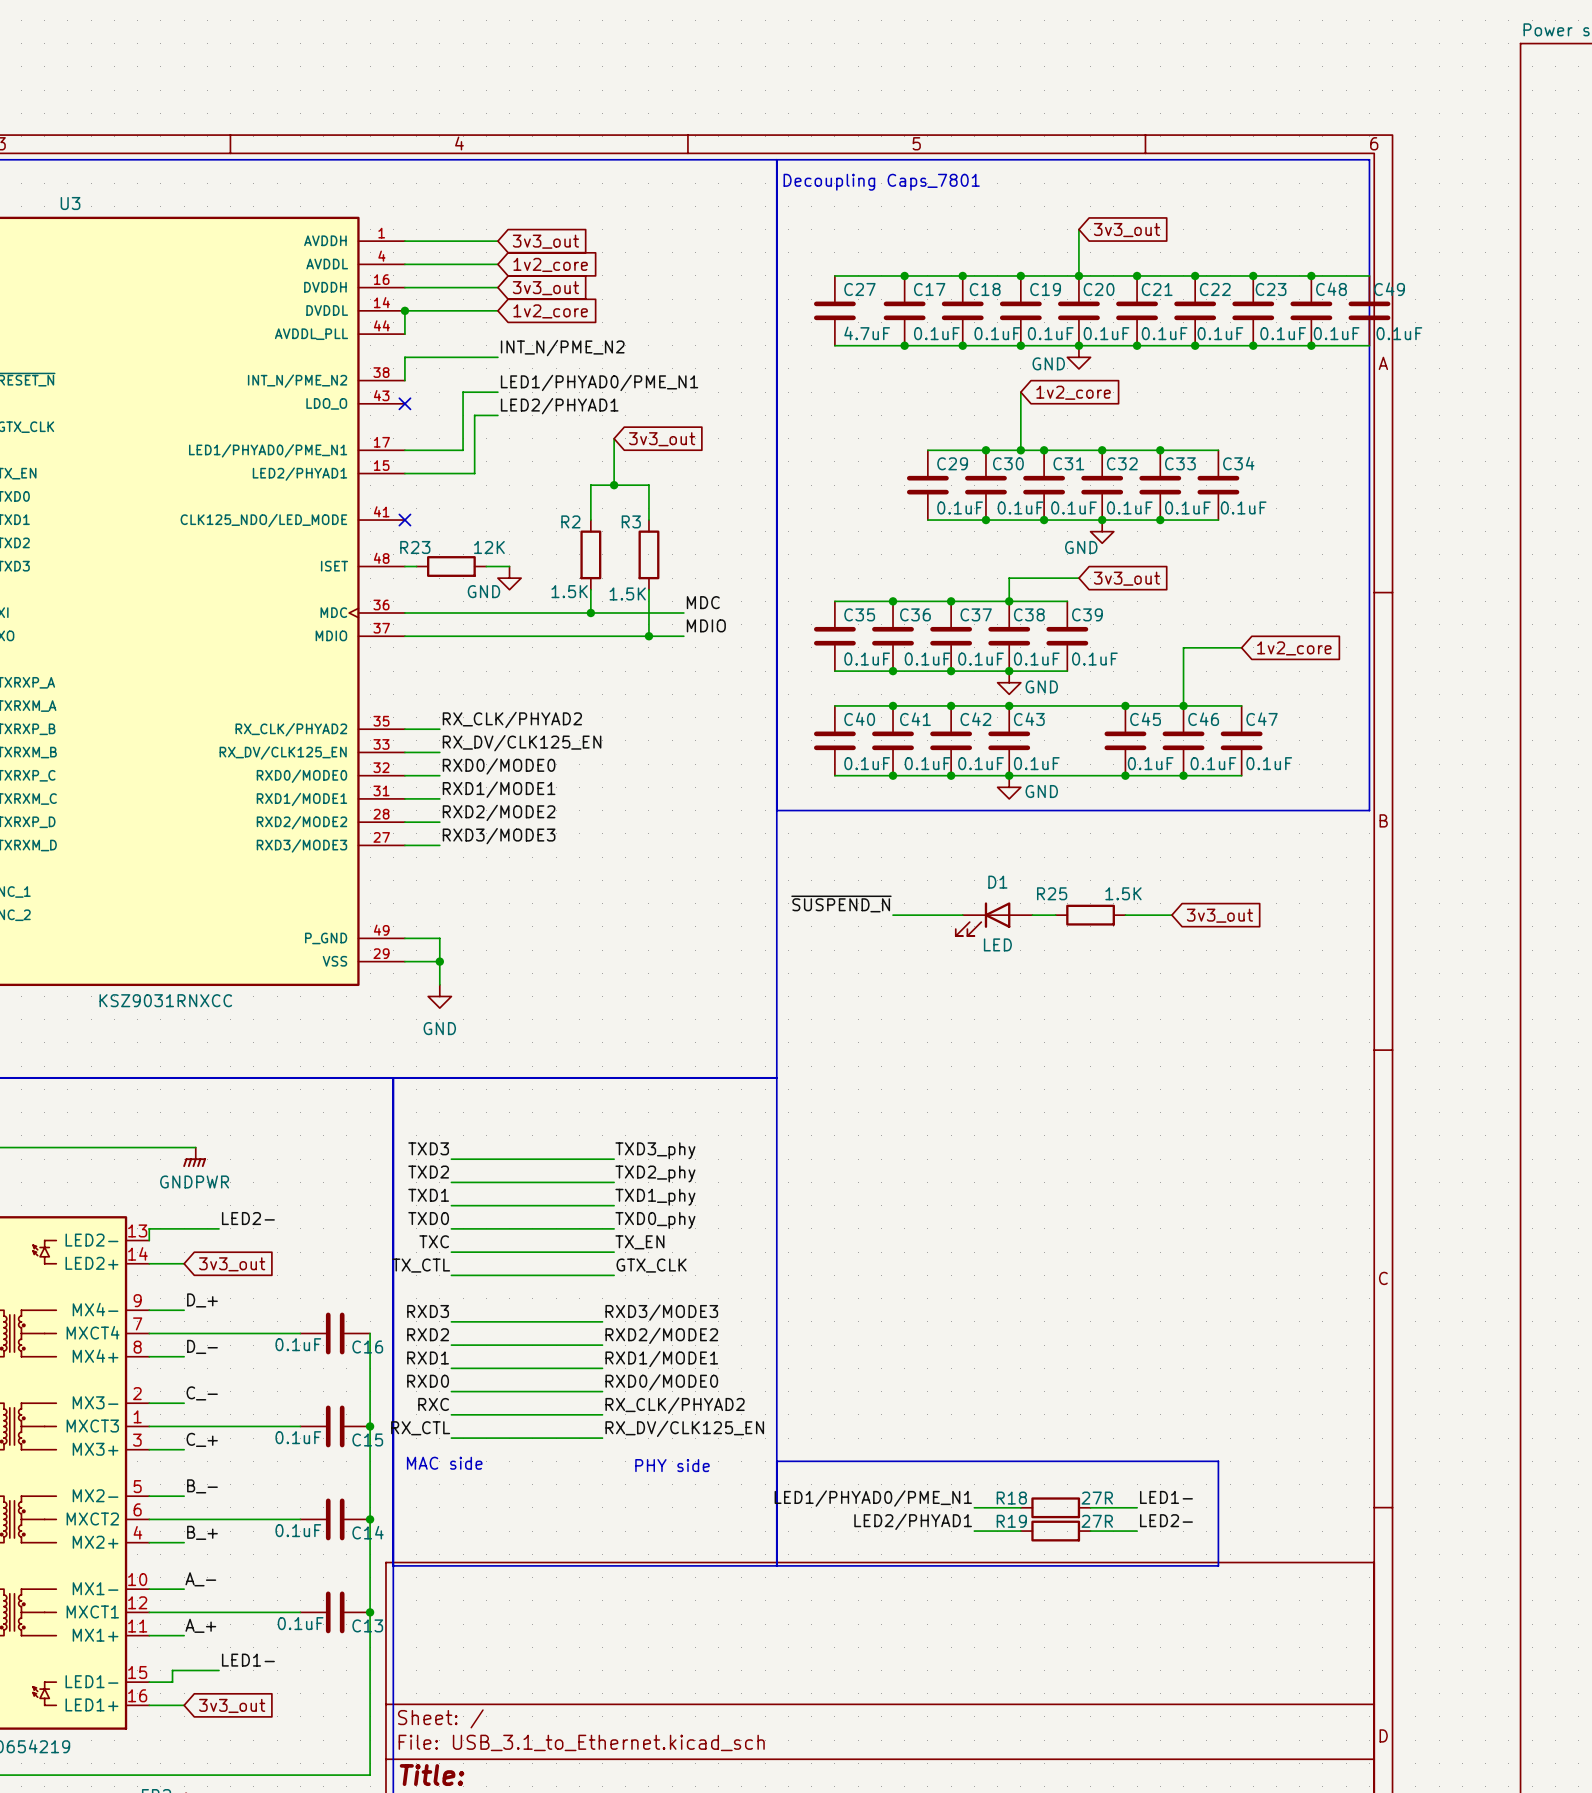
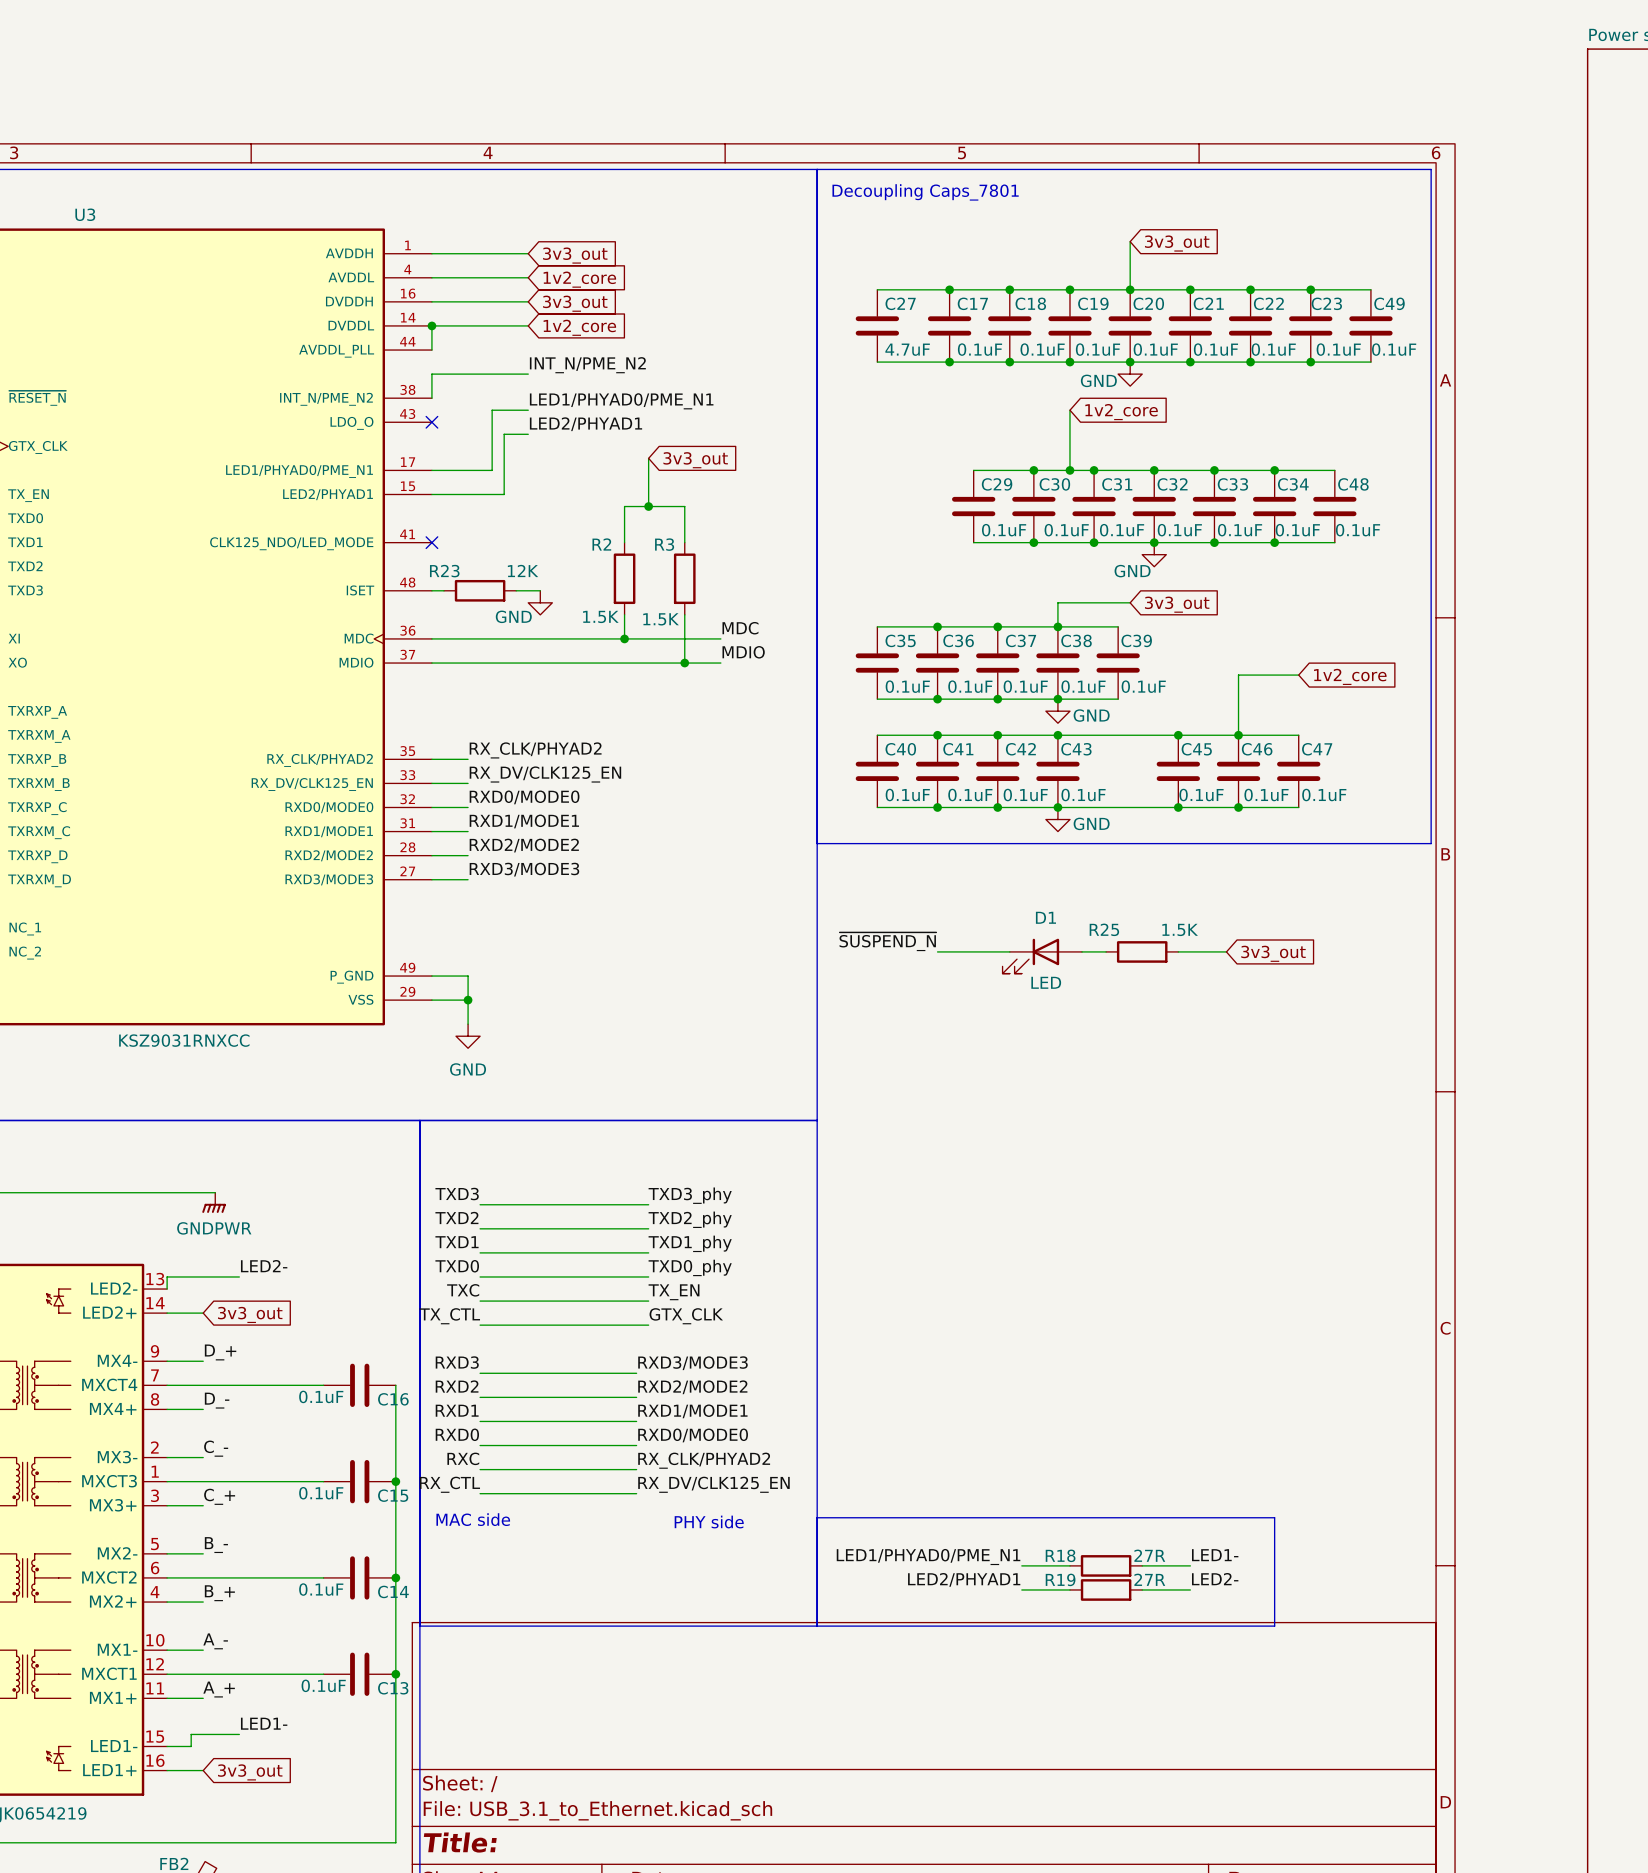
wire: (1311, 275) (1369, 275) -> none
junction: (1311, 275) -> none
C48 name: C48 (1331, 289) -> C49 (1389, 303)
C49: 0.1uF (1369, 310) -> none
wire: (1311, 345) (1369, 345) -> (1274, 470) (1334, 470)
junction: (1311, 345) -> none
junction: none -> (1274, 470)
C48: none -> 0.1uF (1334, 506)
wire: none -> (1274, 542) (1334, 542)
junction: none -> (1274, 542)

